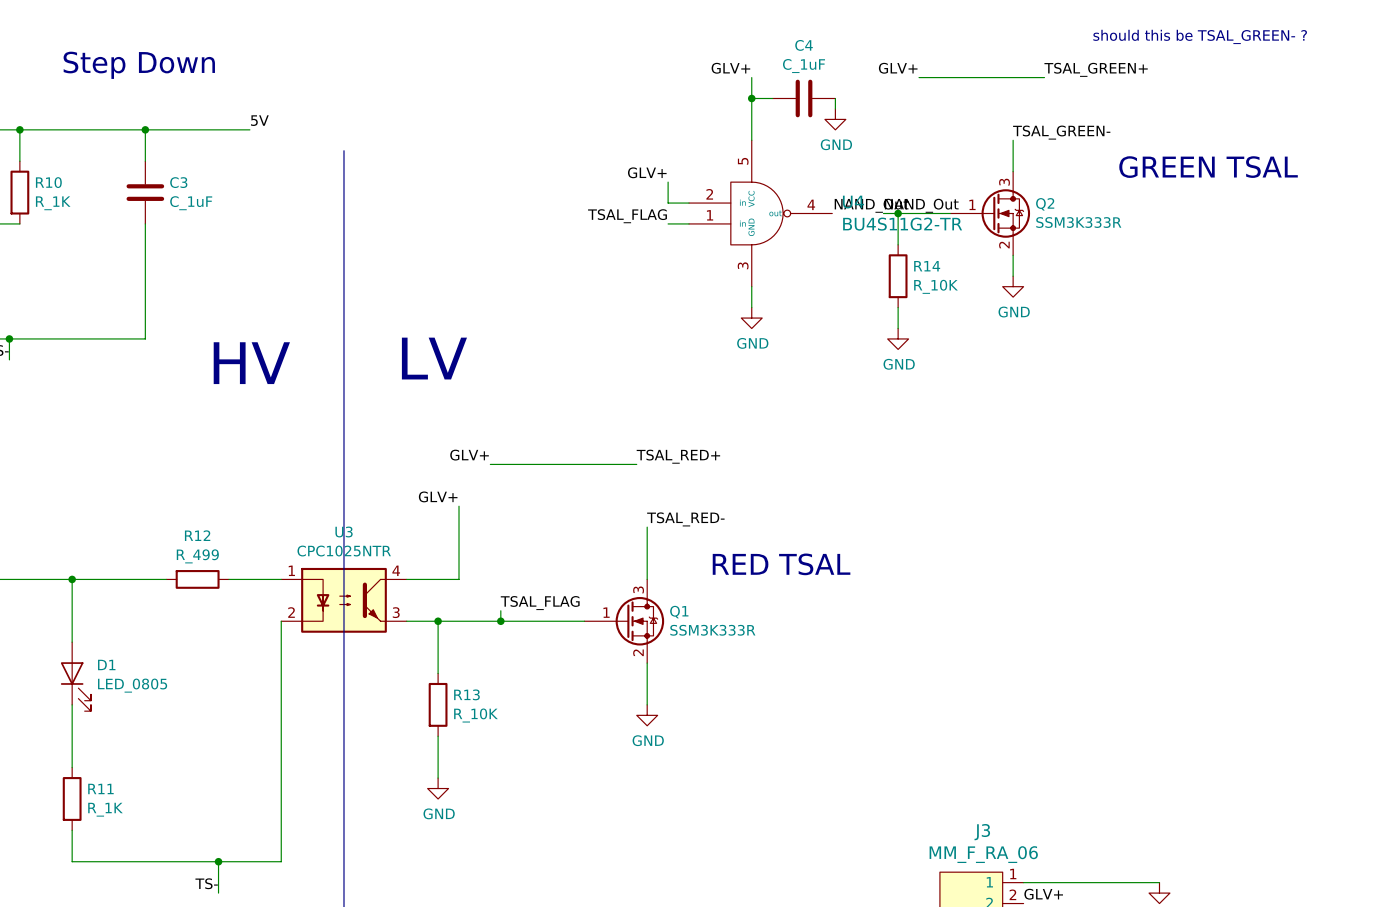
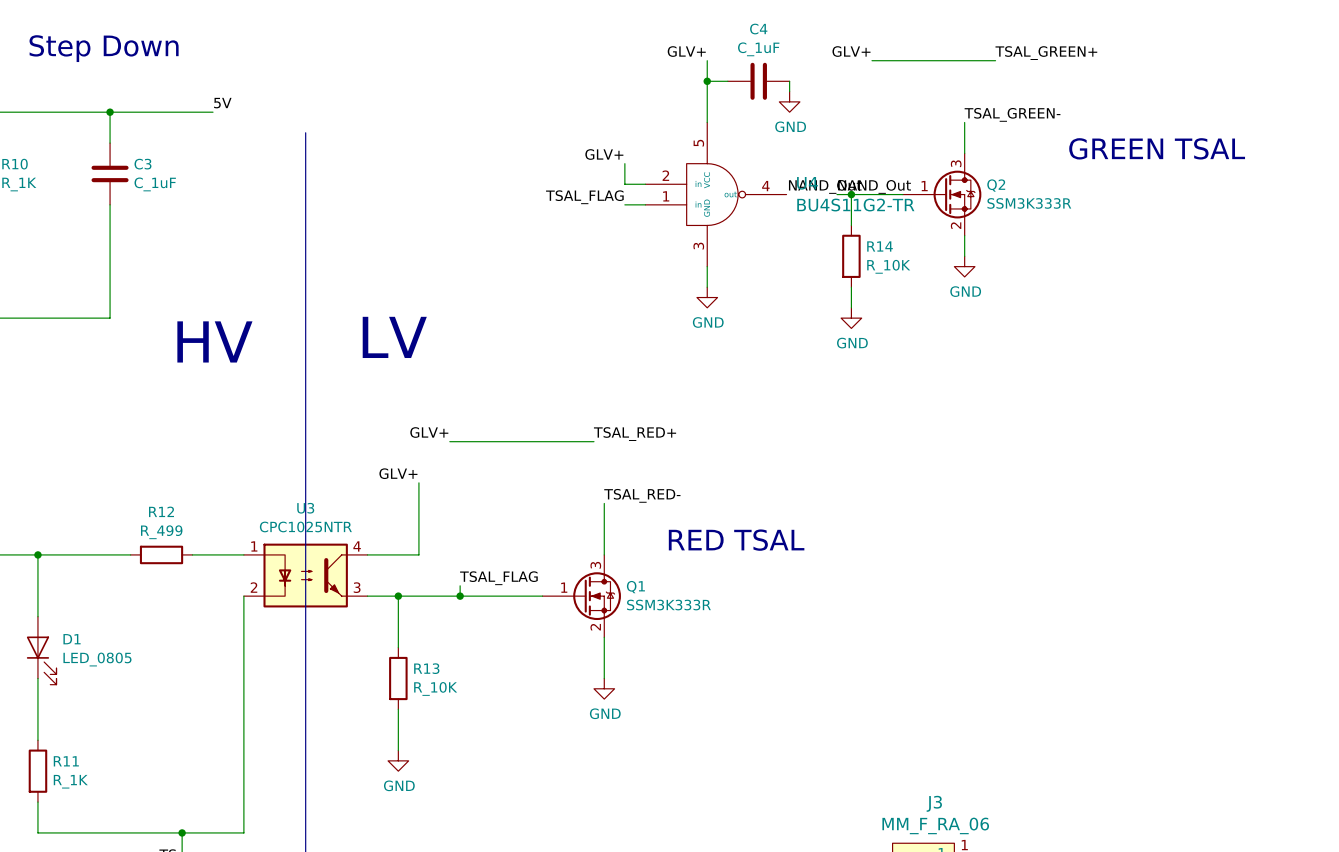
text: should this be TSAL_GREEN- ? (1200, 36) -> none

